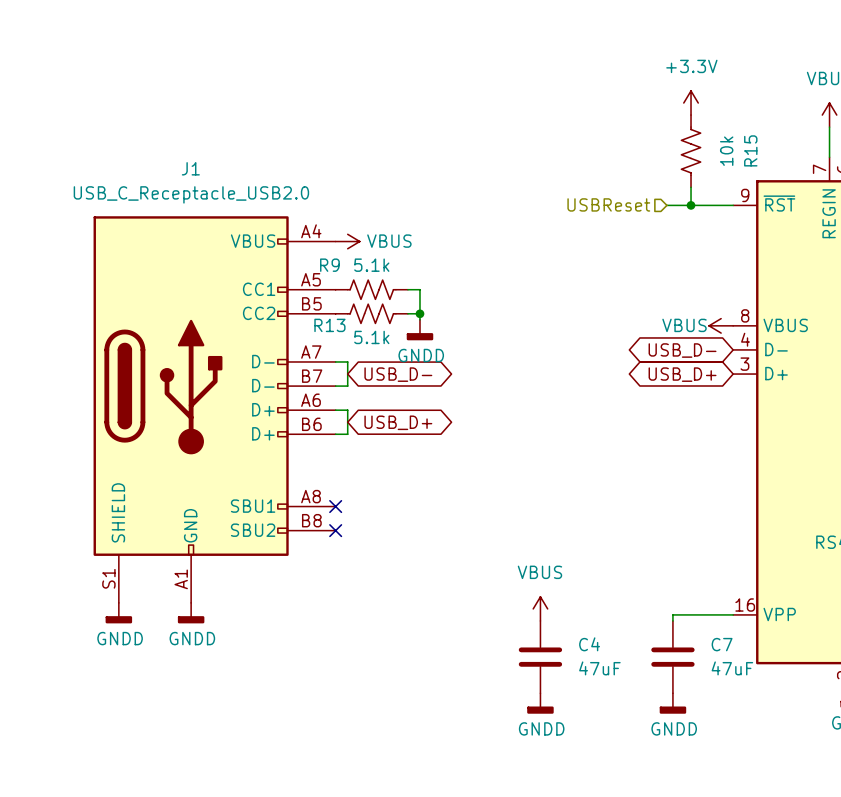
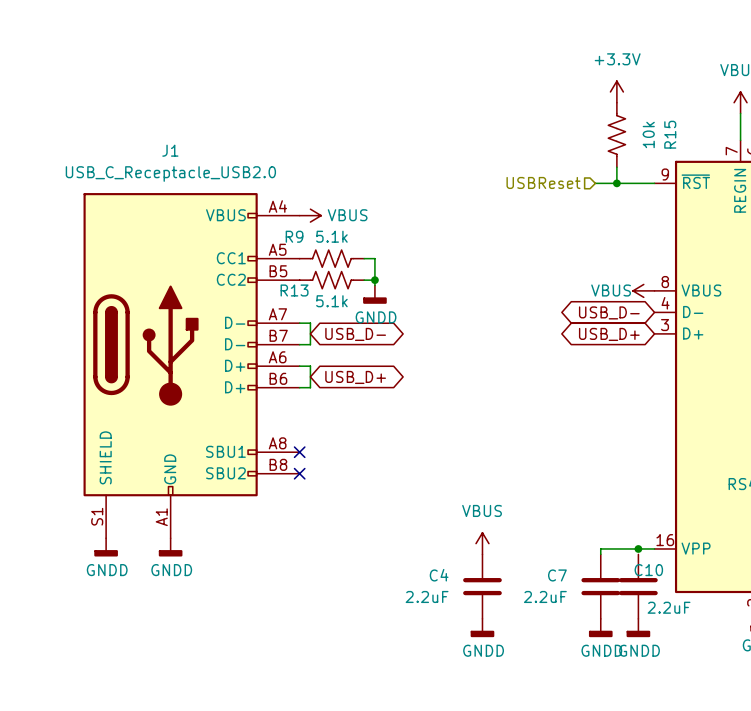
junction: none -> (638, 548)
C4 name position: C4 (589, 644) -> C4 (439, 575)
C7 name position: C7 (722, 644) -> C7 (557, 575)
C10: none -> 2.2uF (638, 586)
C4 value: 47uF (599, 668) -> 2.2uF (427, 596)
C7 value: 47uF (732, 668) -> 2.2uF (545, 596)
power symbol: none -> GNDD (638, 628)

